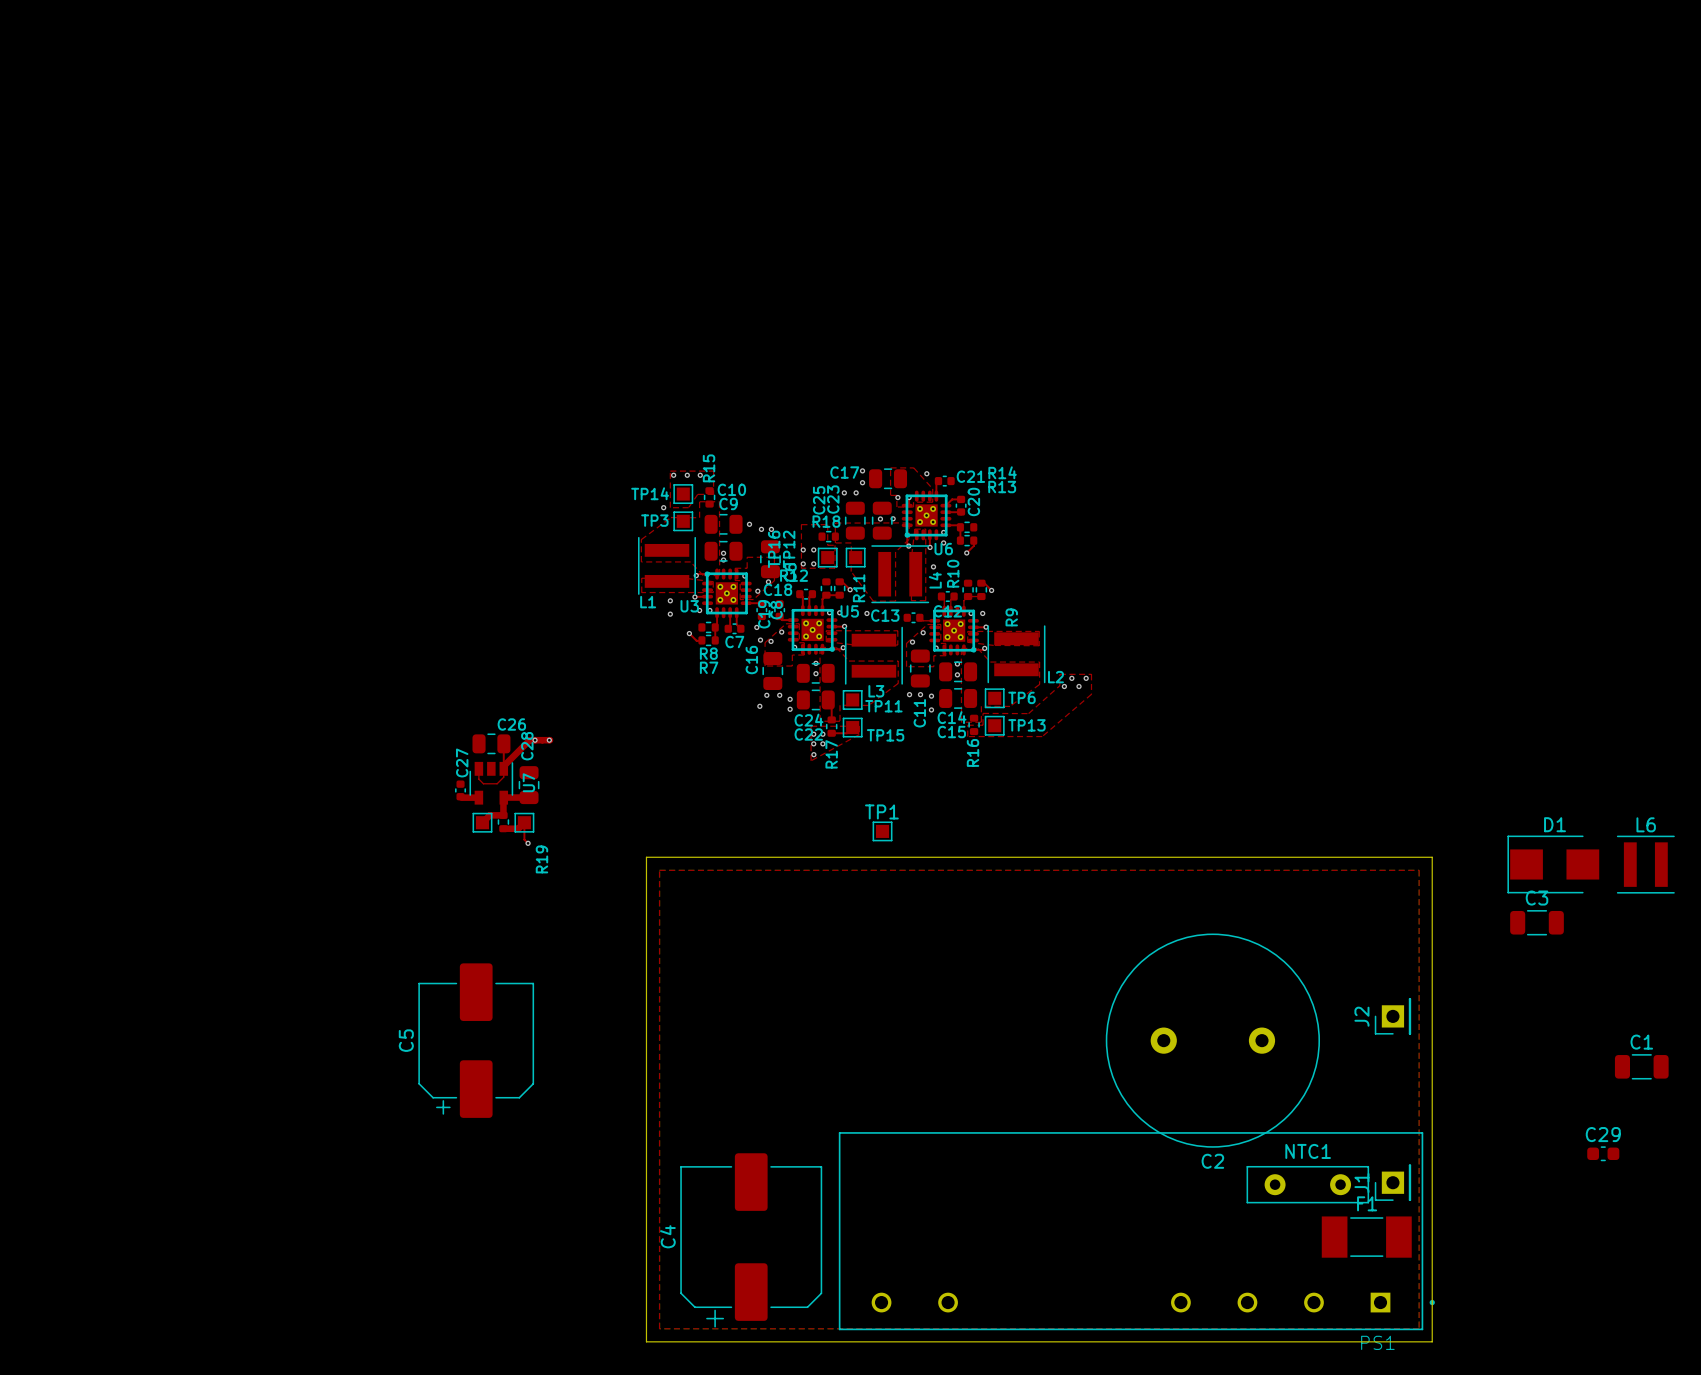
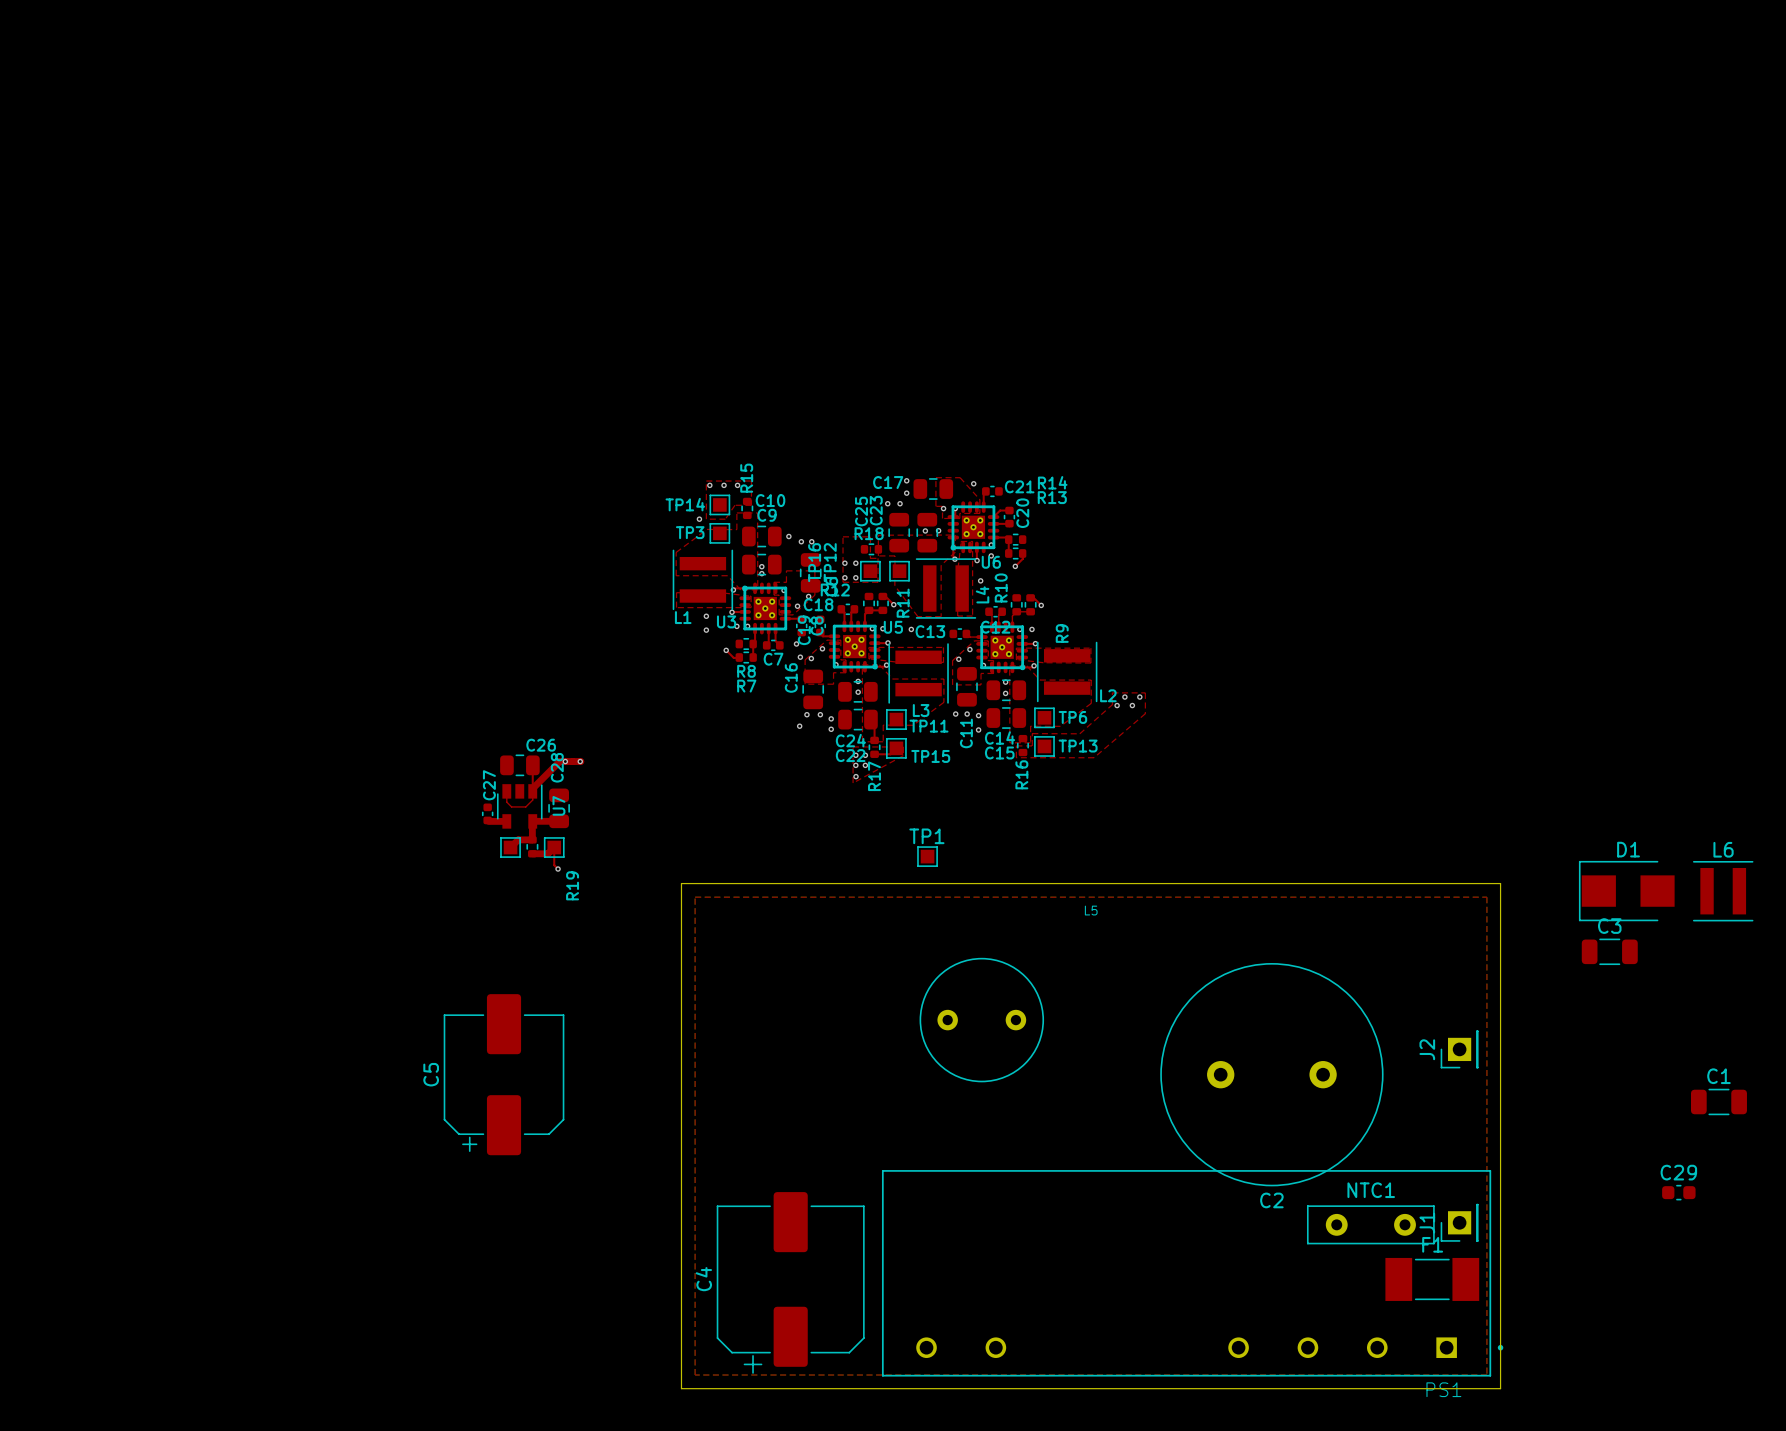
L5: none -> (981, 1020)

